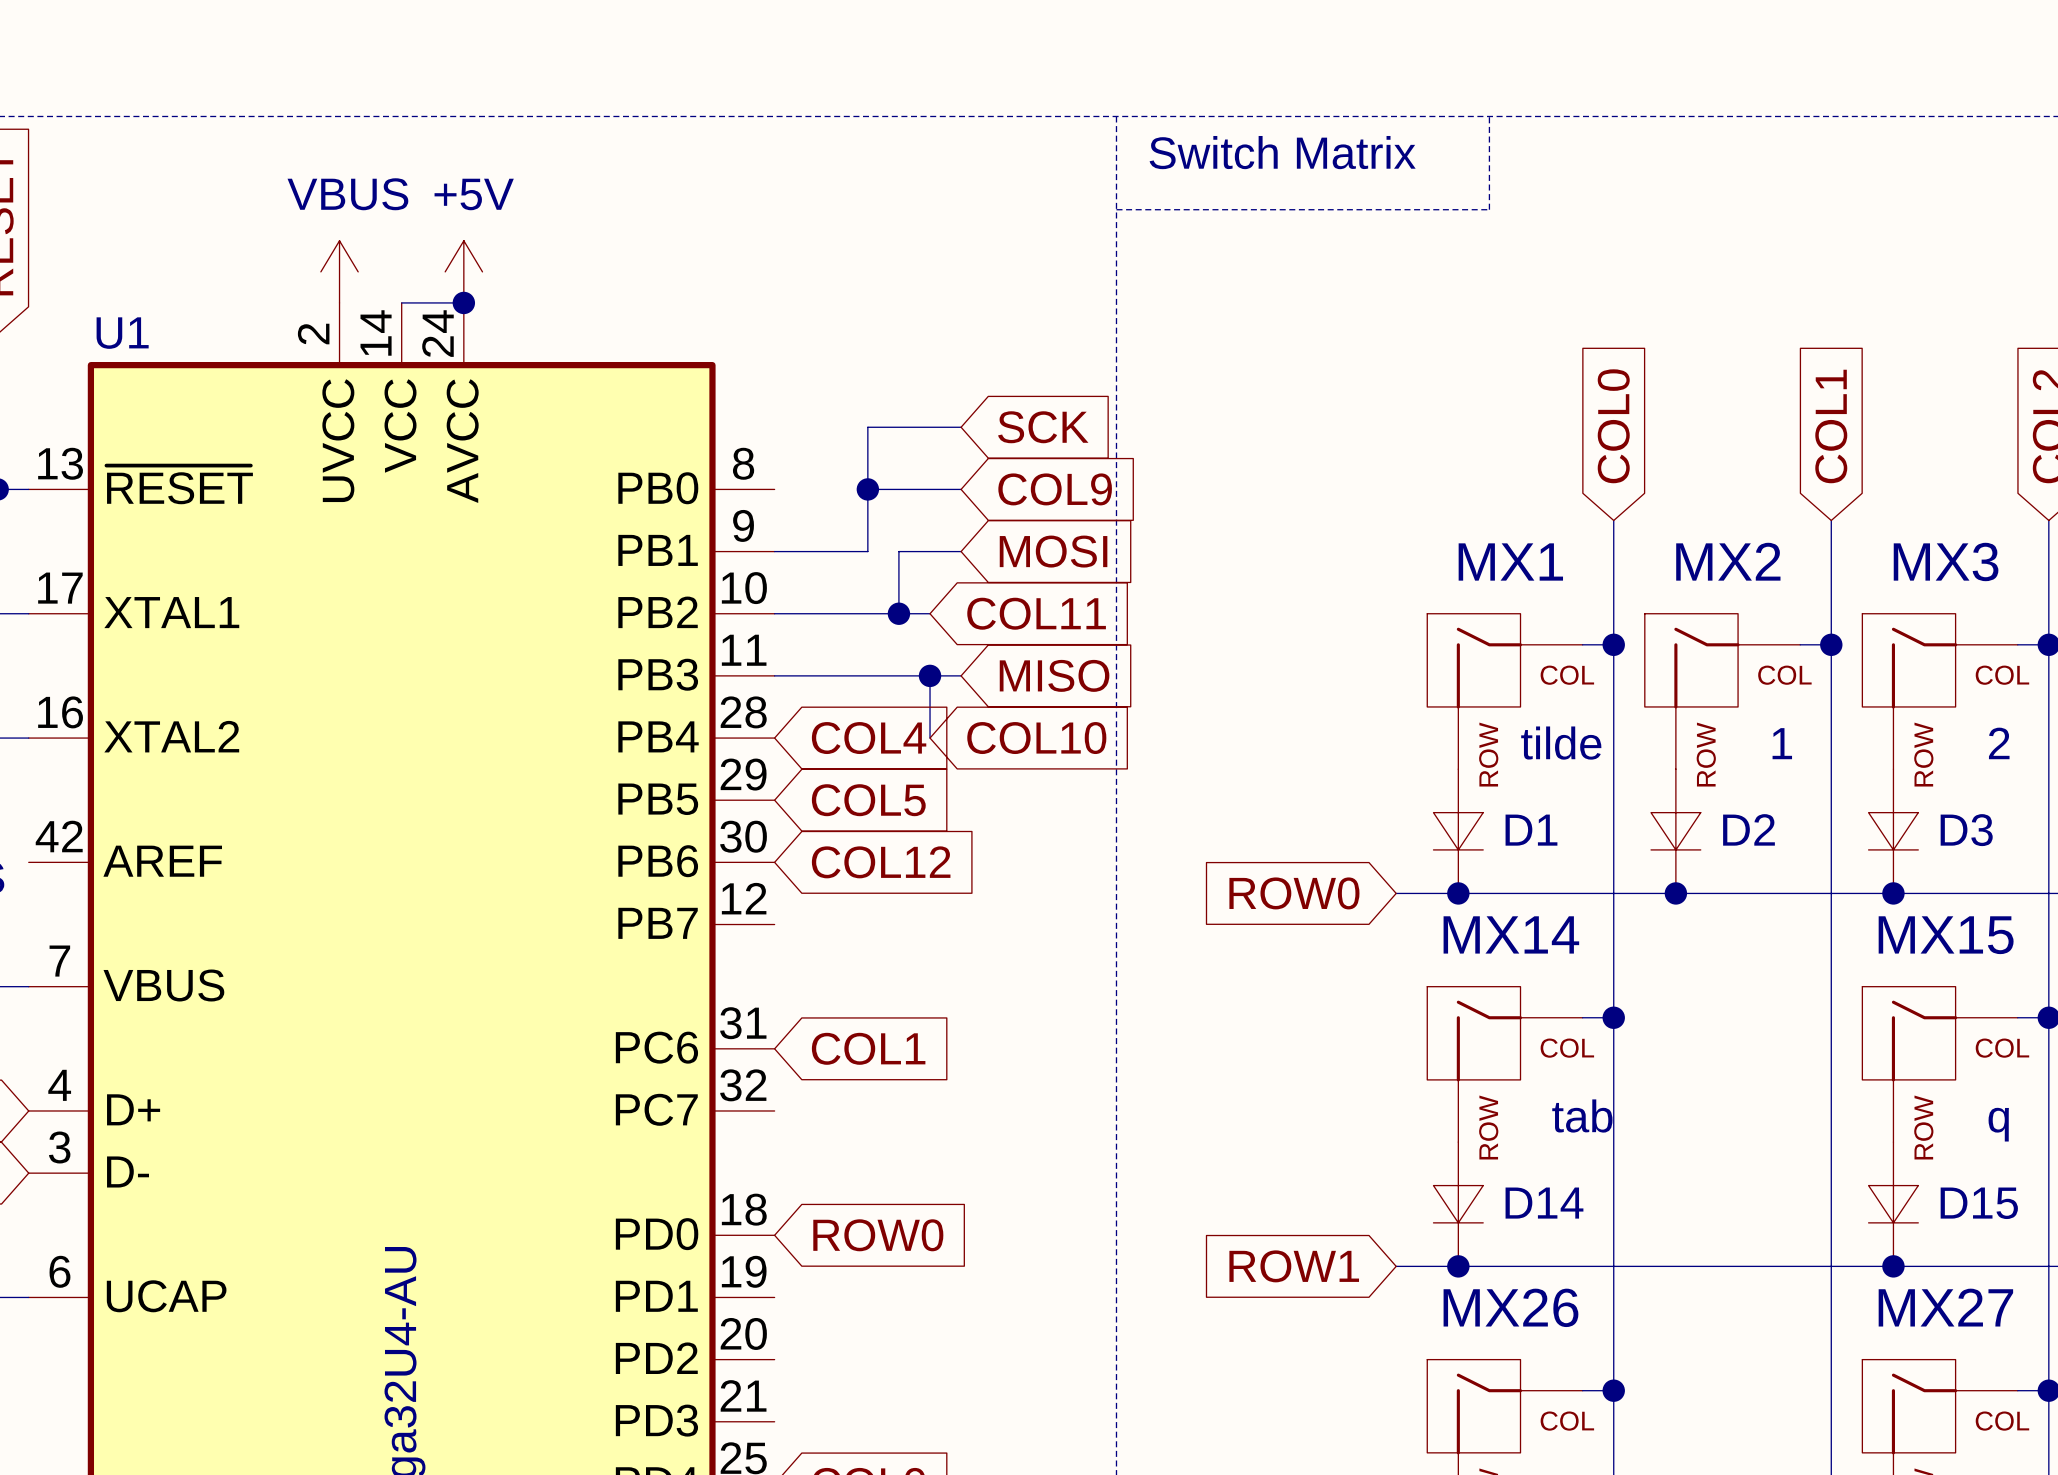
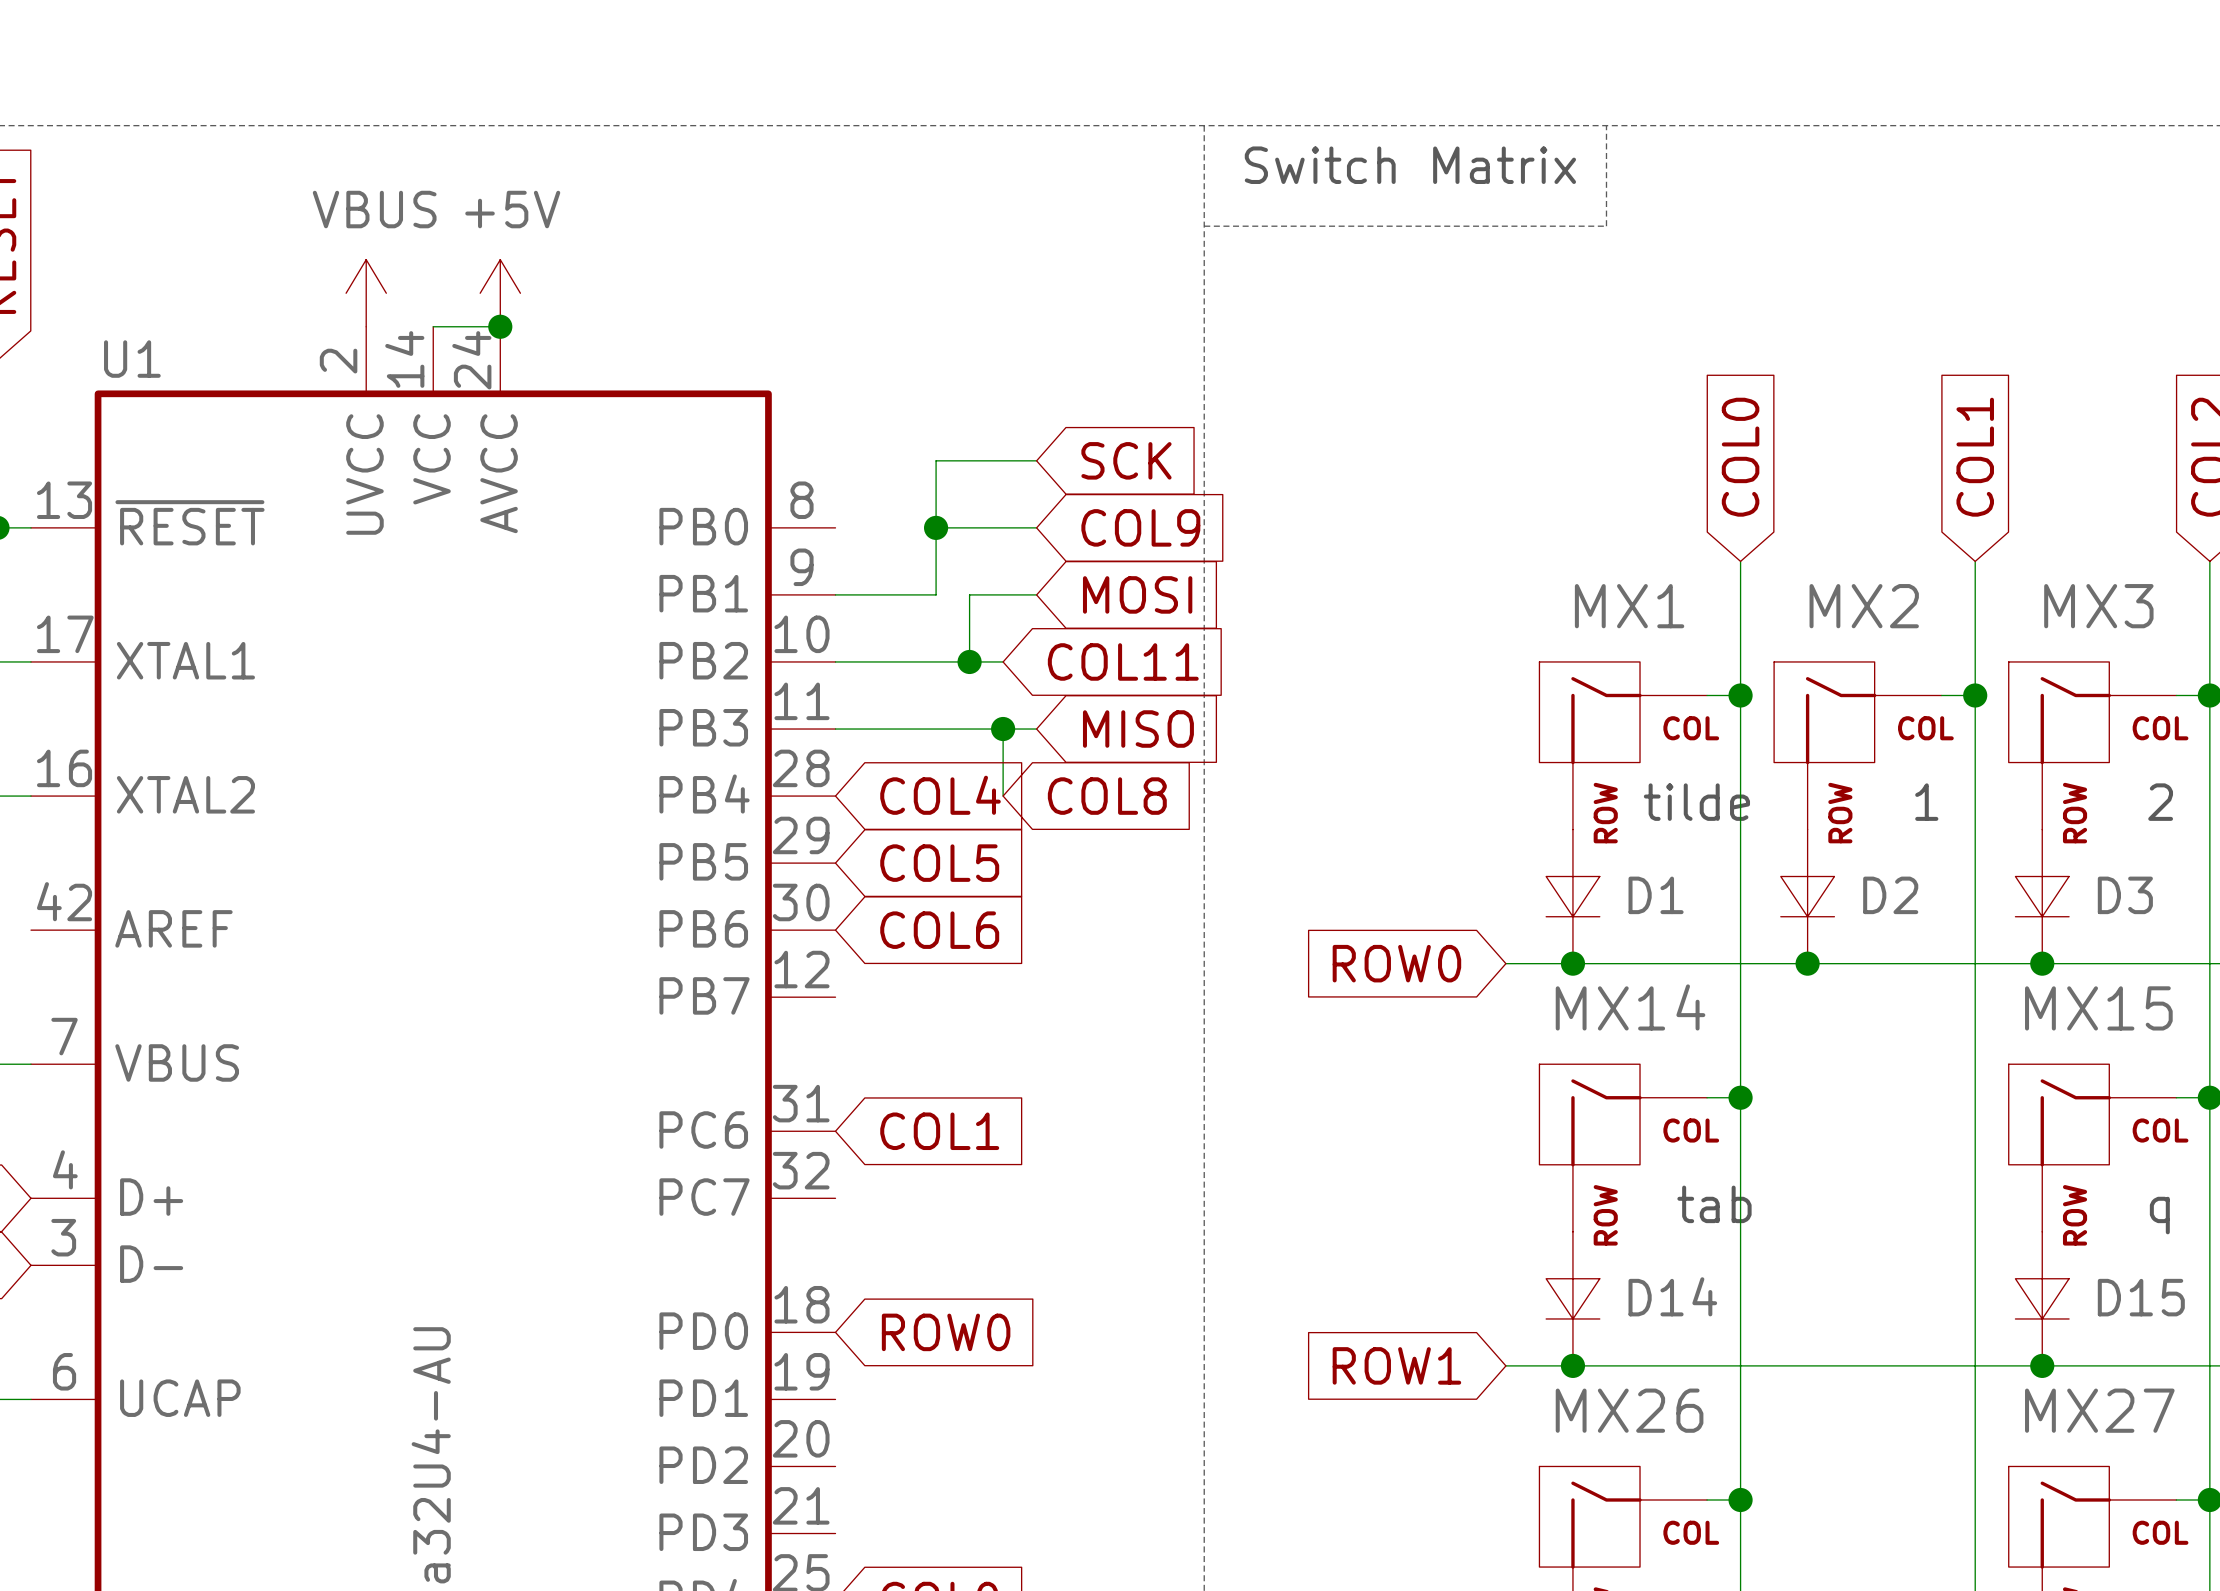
global label: COL10 (1036, 738) -> COL8 (1107, 796)
global label: COL12 (881, 862) -> COL6 (939, 930)

